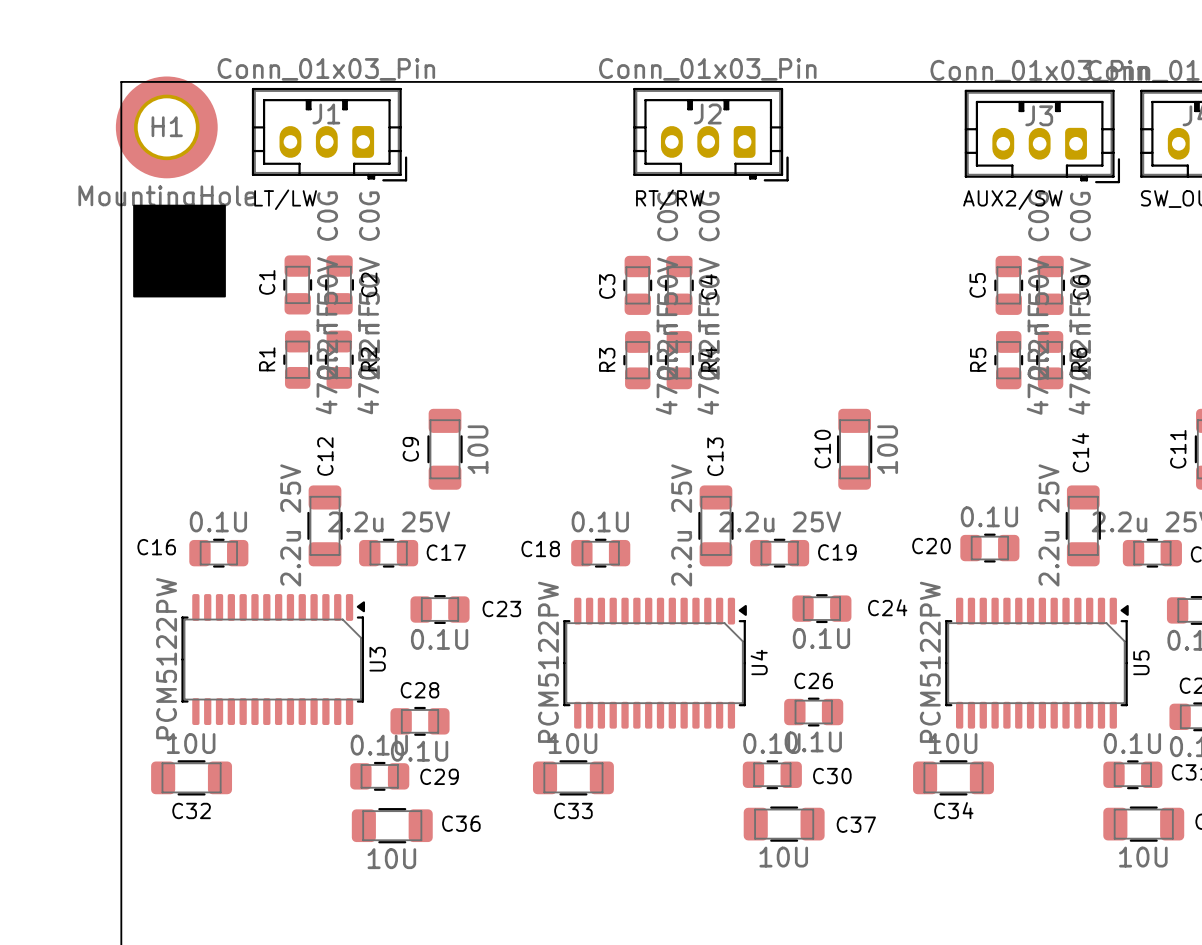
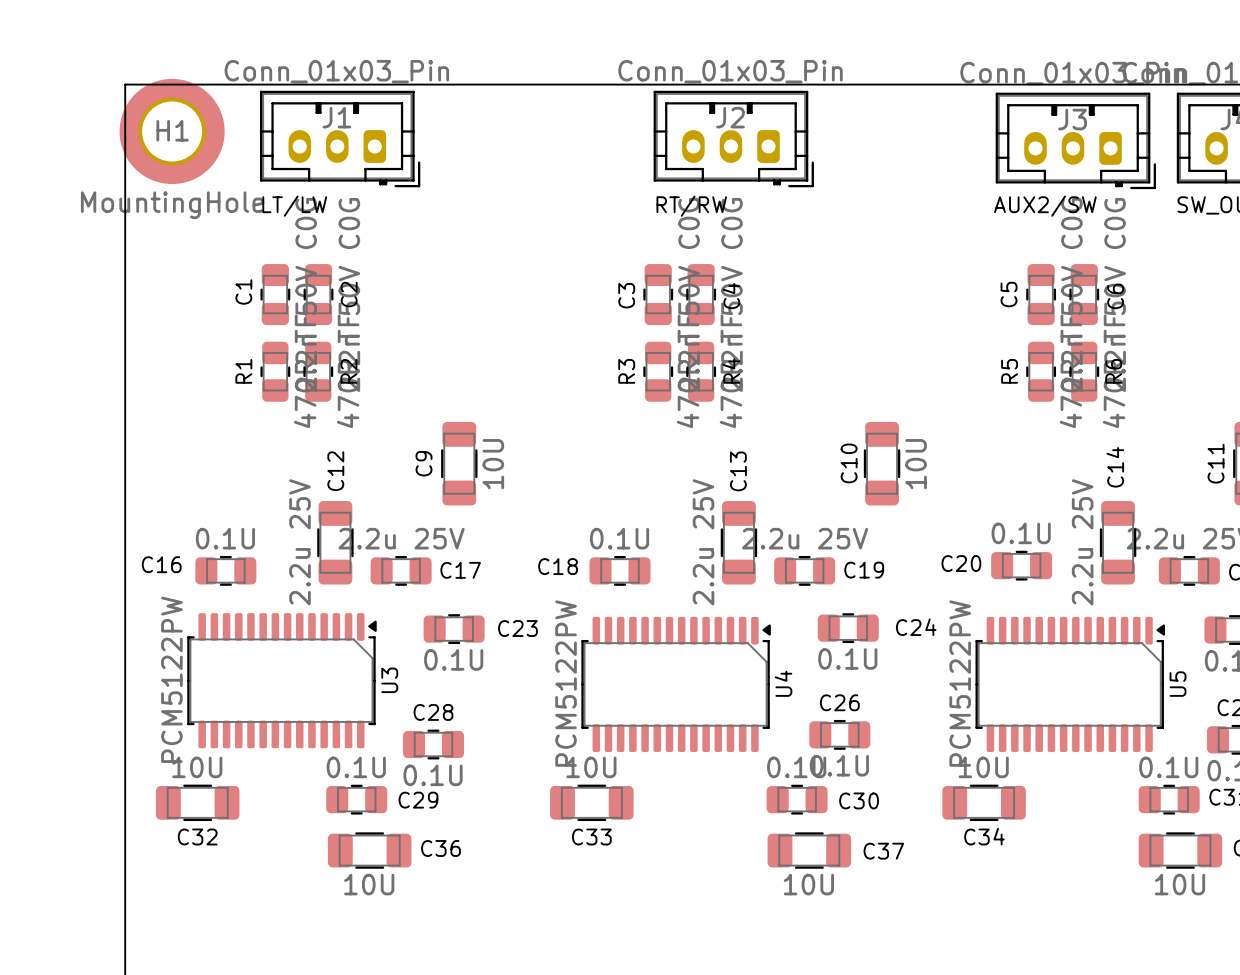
drawing: [133, 204, 226, 298] -> none
C1 position: (297, 284) -> (275, 294)
C2 position: (339, 284) -> (318, 294)
R1 position: (297, 359) -> (275, 371)
R2 position: (339, 359) -> (318, 371)
C29 position: (379, 776) -> (356, 799)
C36 position: (392, 825) -> (369, 850)

